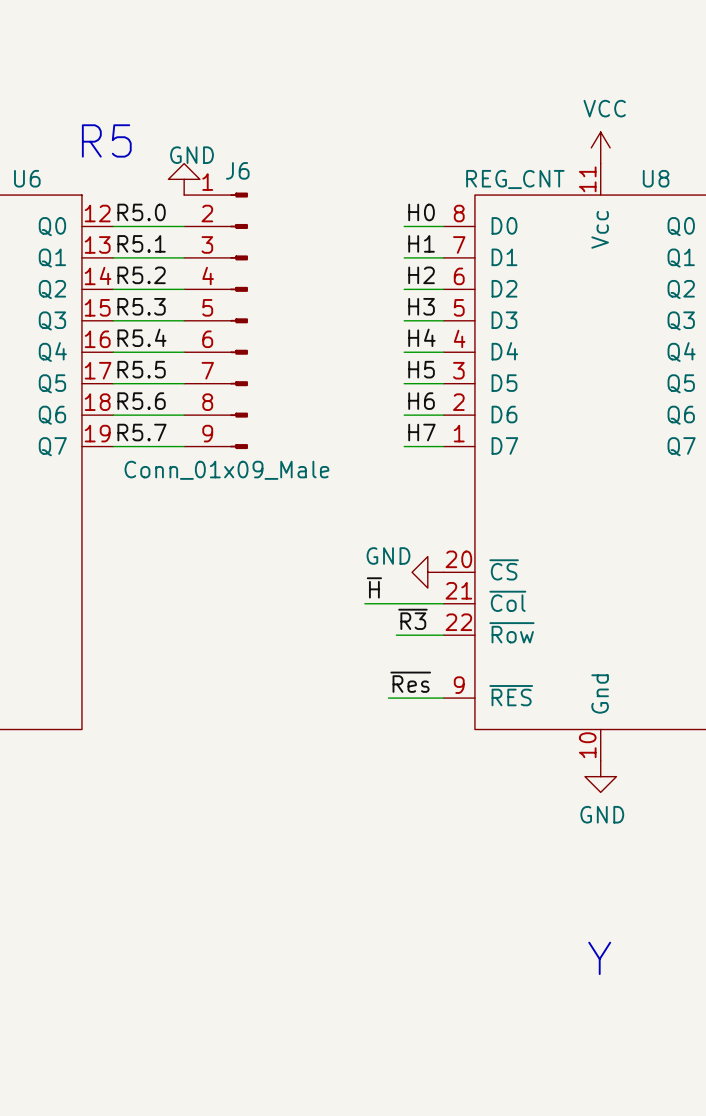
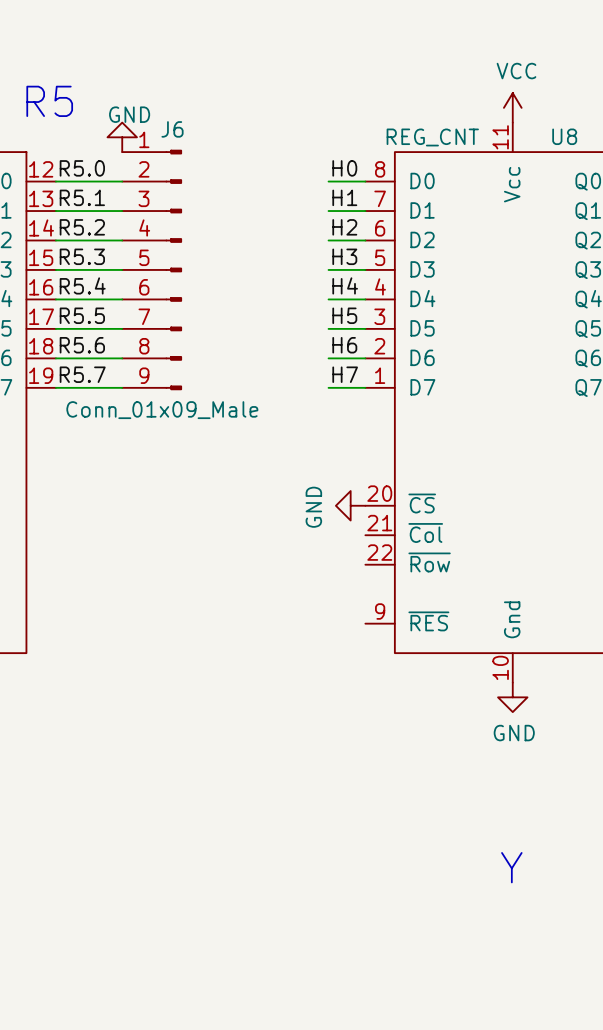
power symbol text rotation: 0° (388, 556) -> 90° counterclockwise (313, 507)
label: ~{H} (374, 587) -> none
wire: (364, 603) (443, 603) -> none
label: ~{R3} (412, 619) -> none
wire: (396, 635) (443, 635) -> none
label: ~{Res} (410, 682) -> none
wire: (388, 698) (443, 698) -> none

